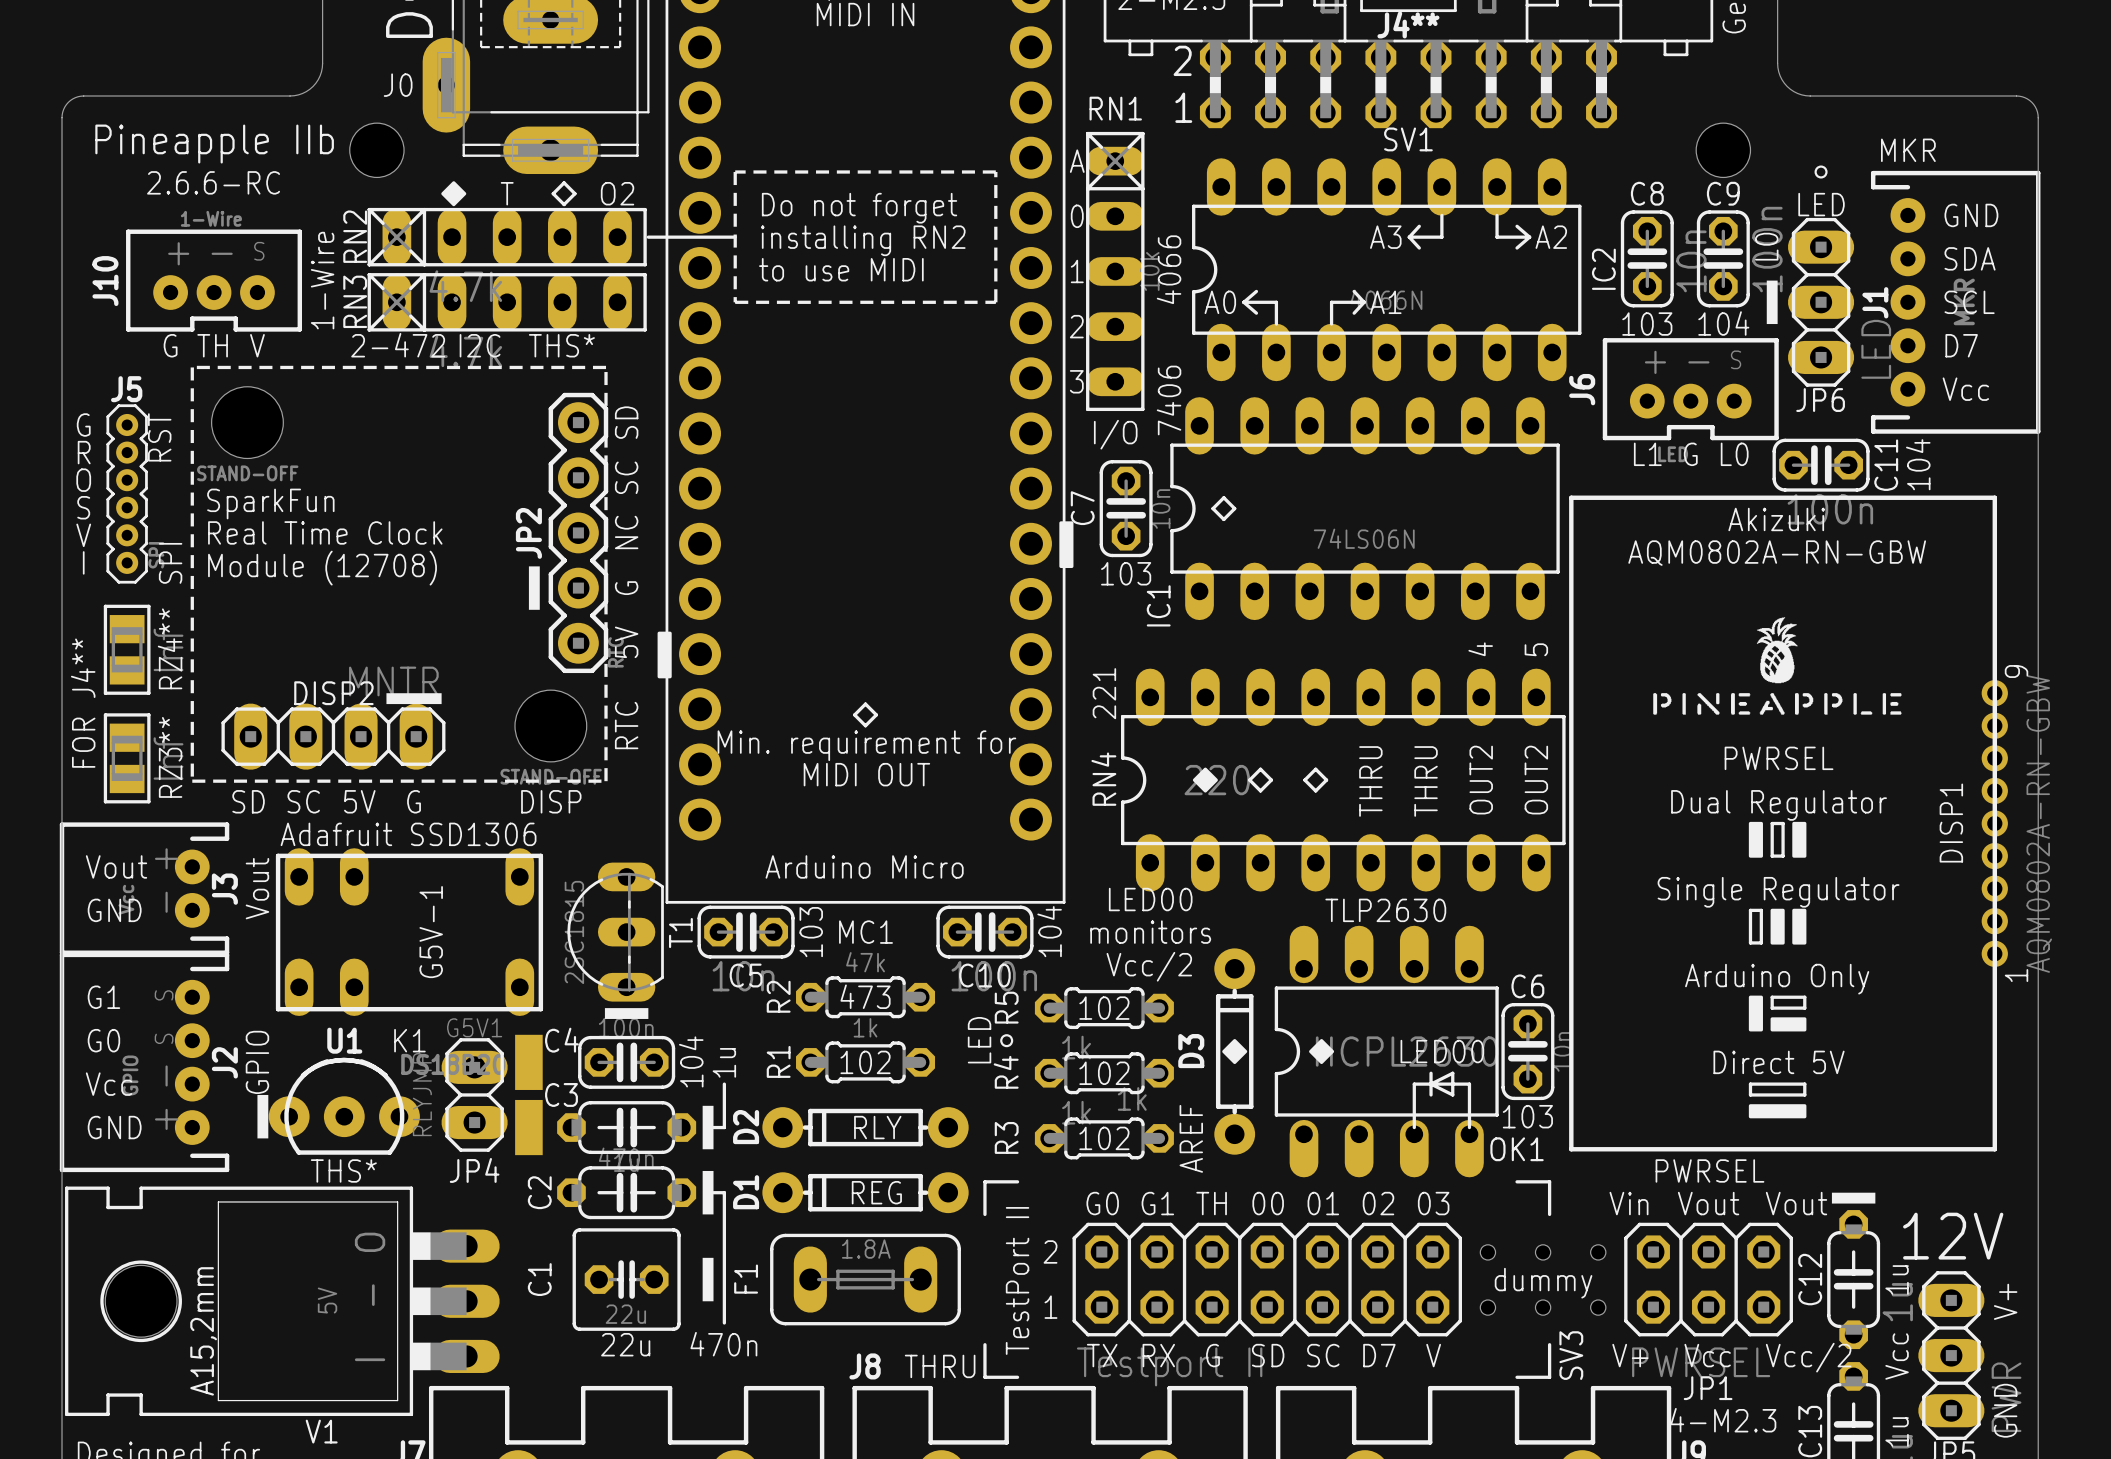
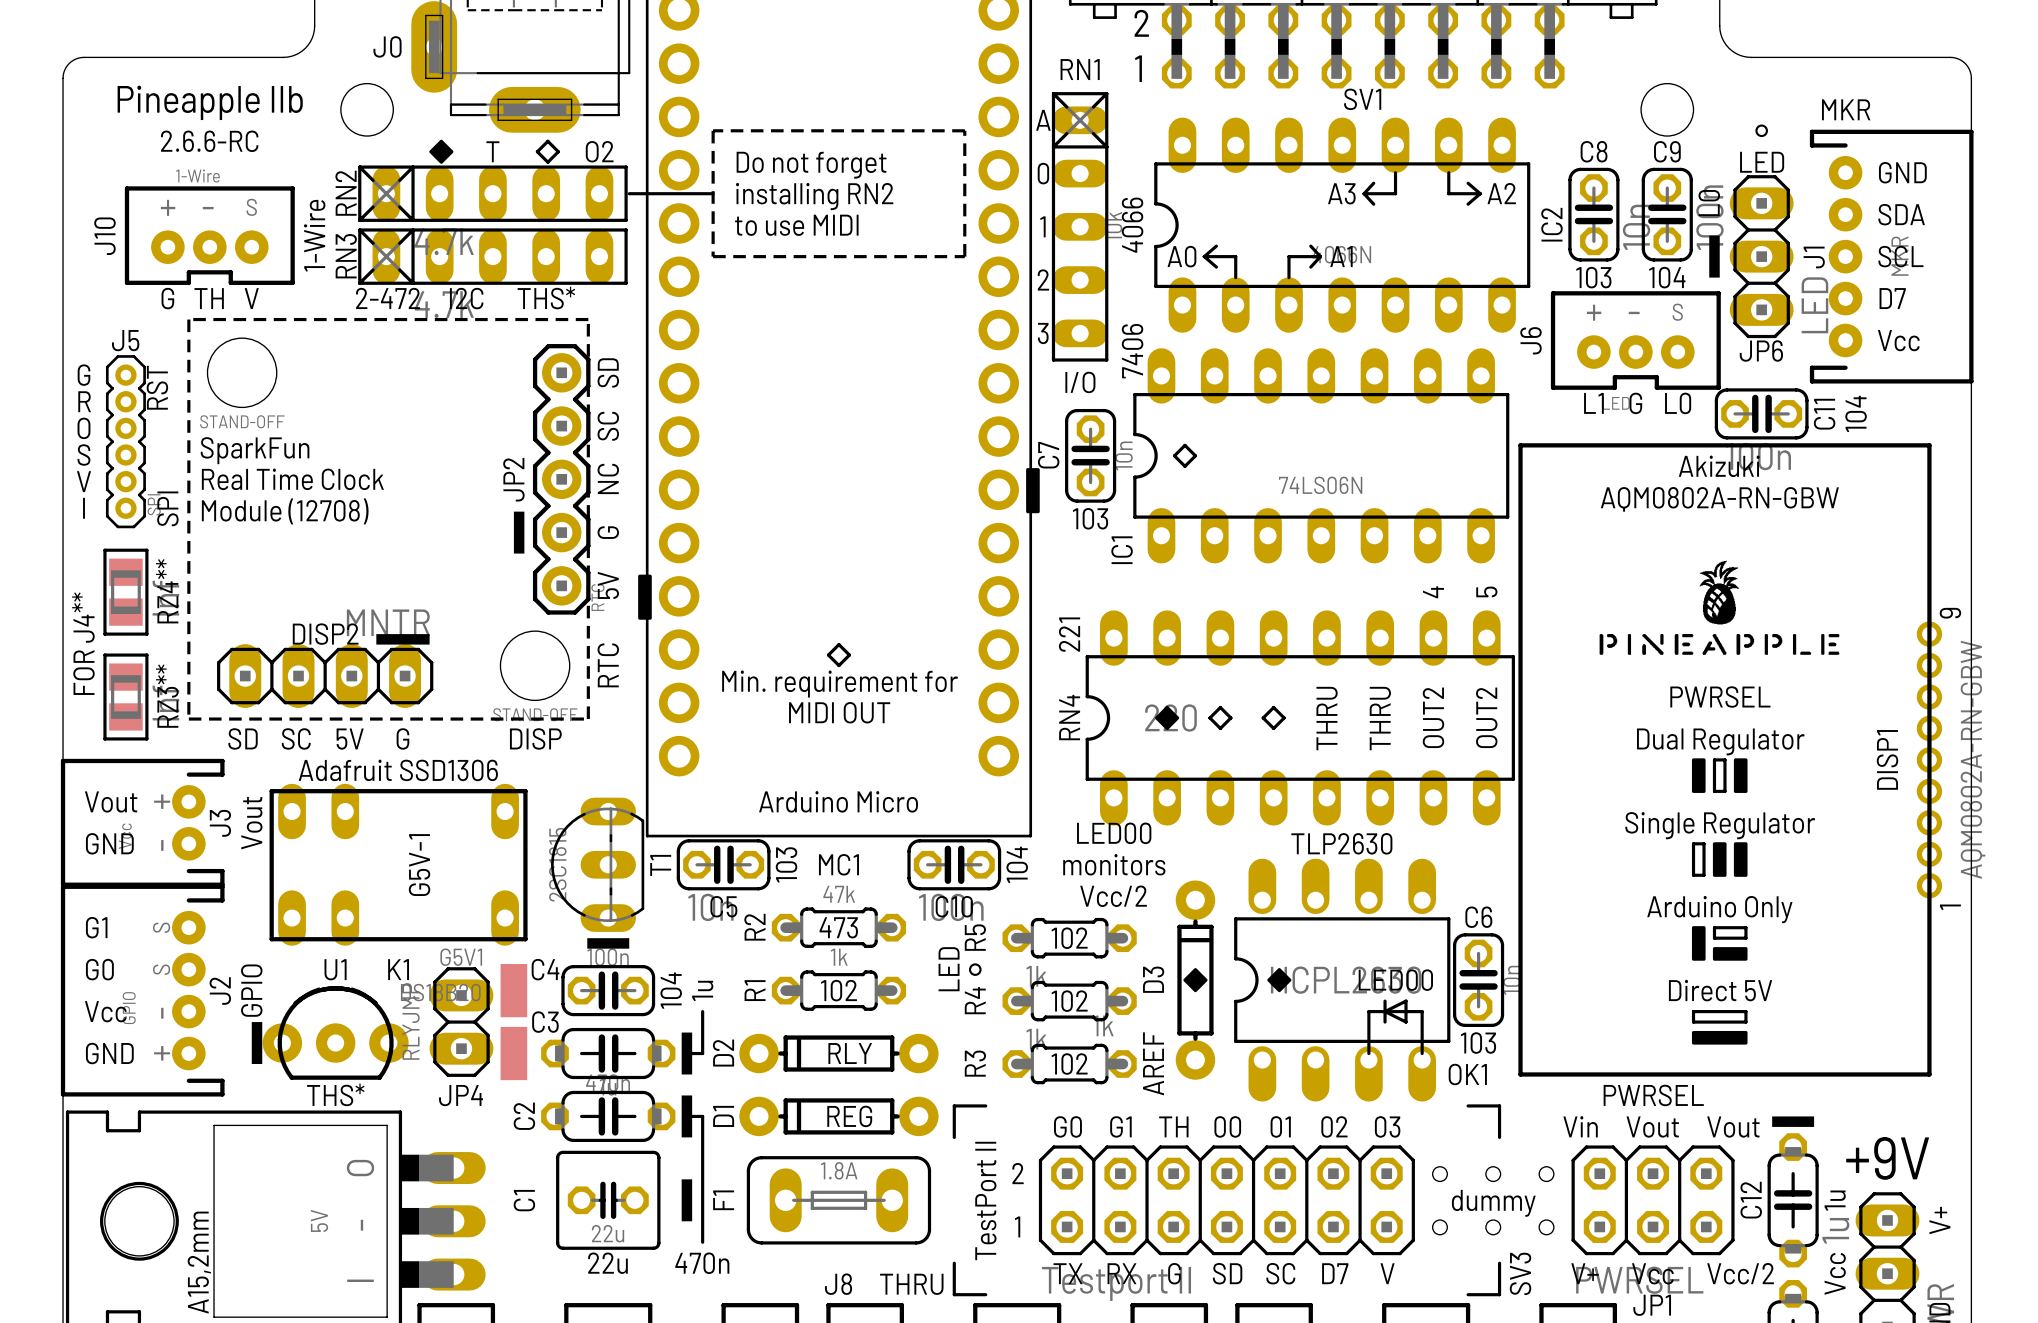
text: 12V (1953, 1236) -> +9V (1887, 1158)

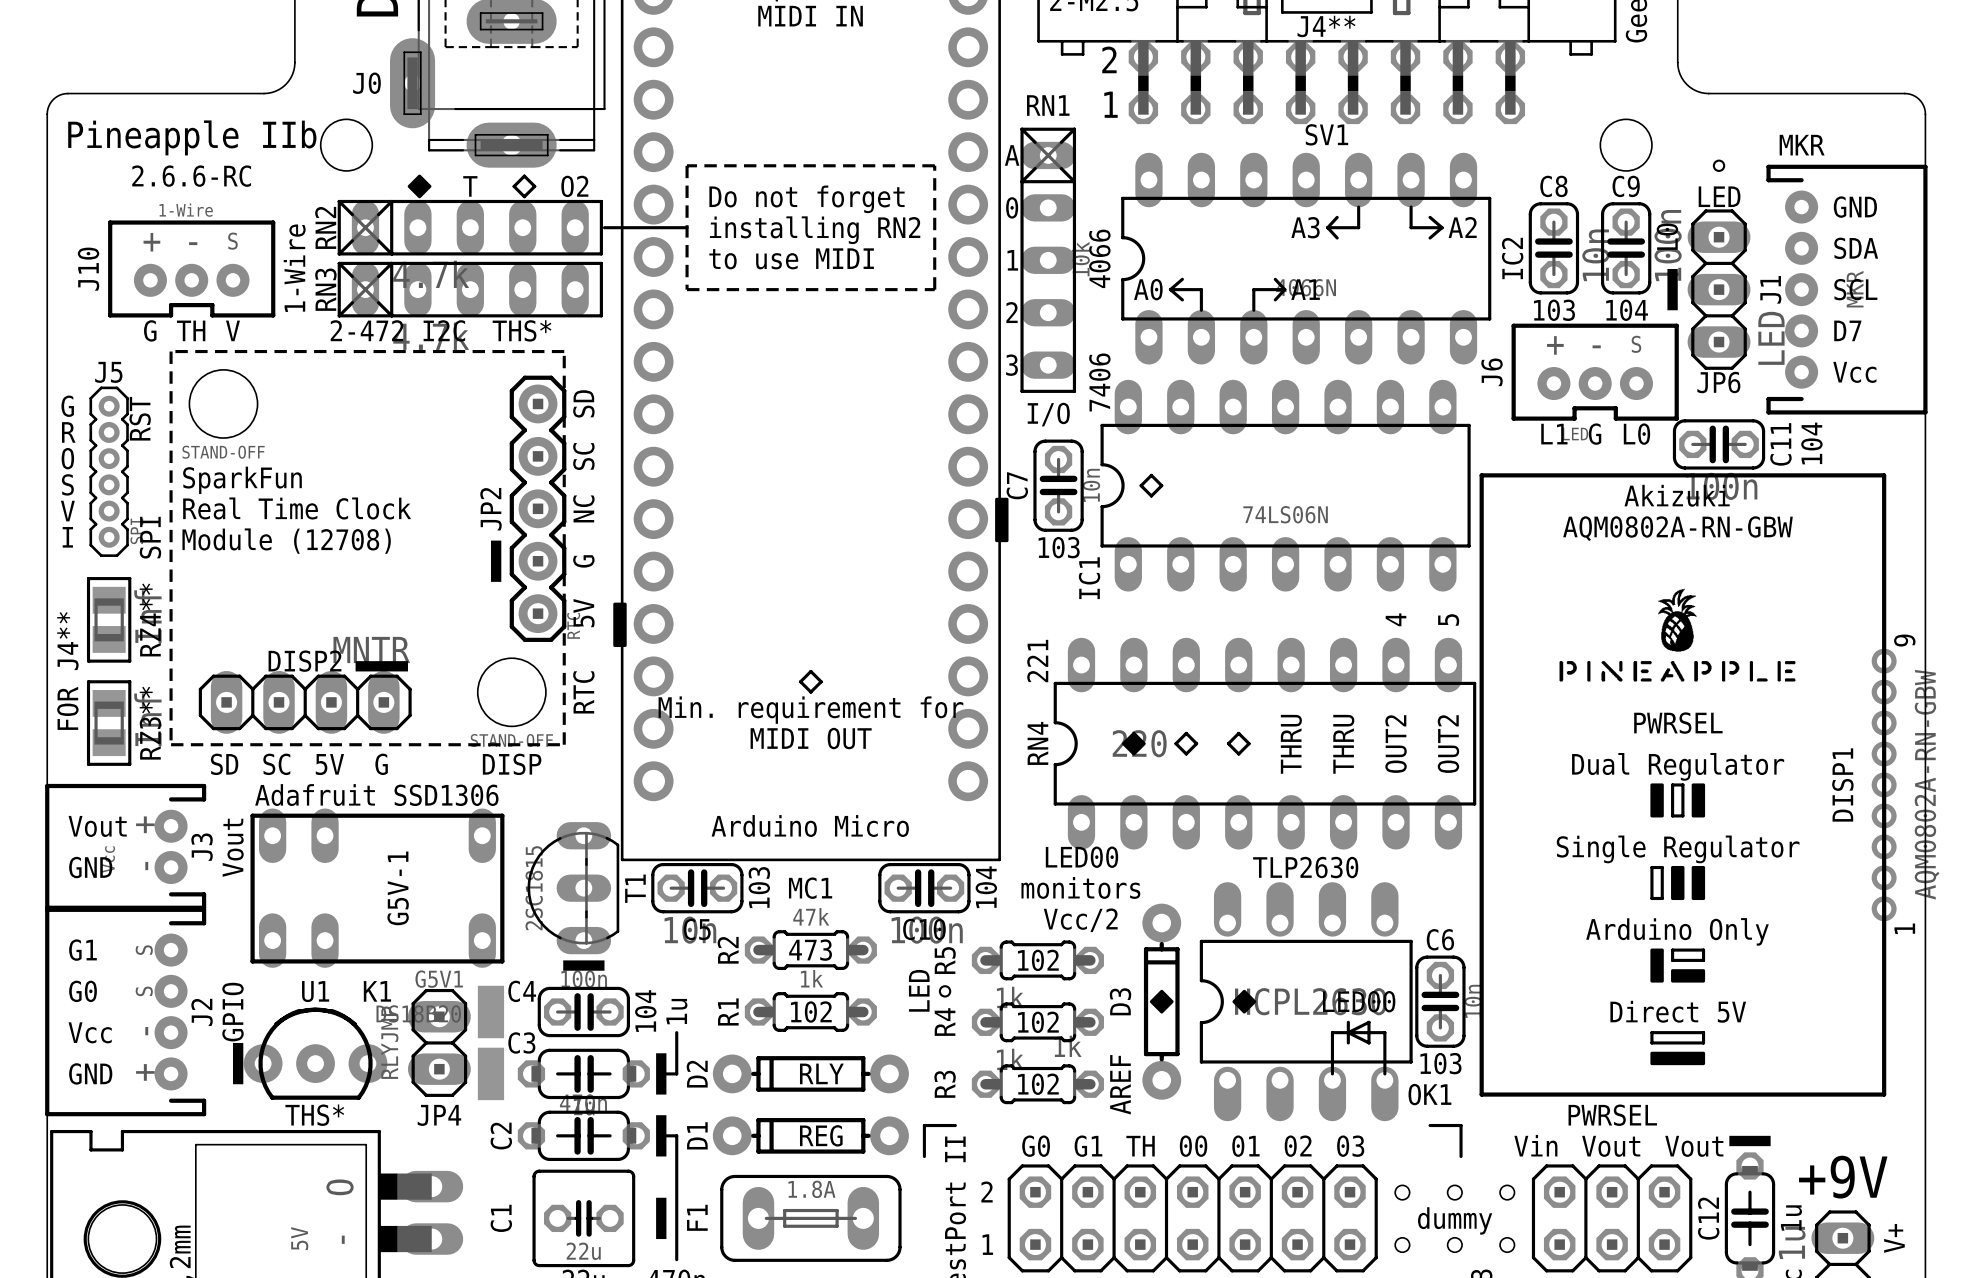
J2 value: GPIO (129, 1008) -> none

